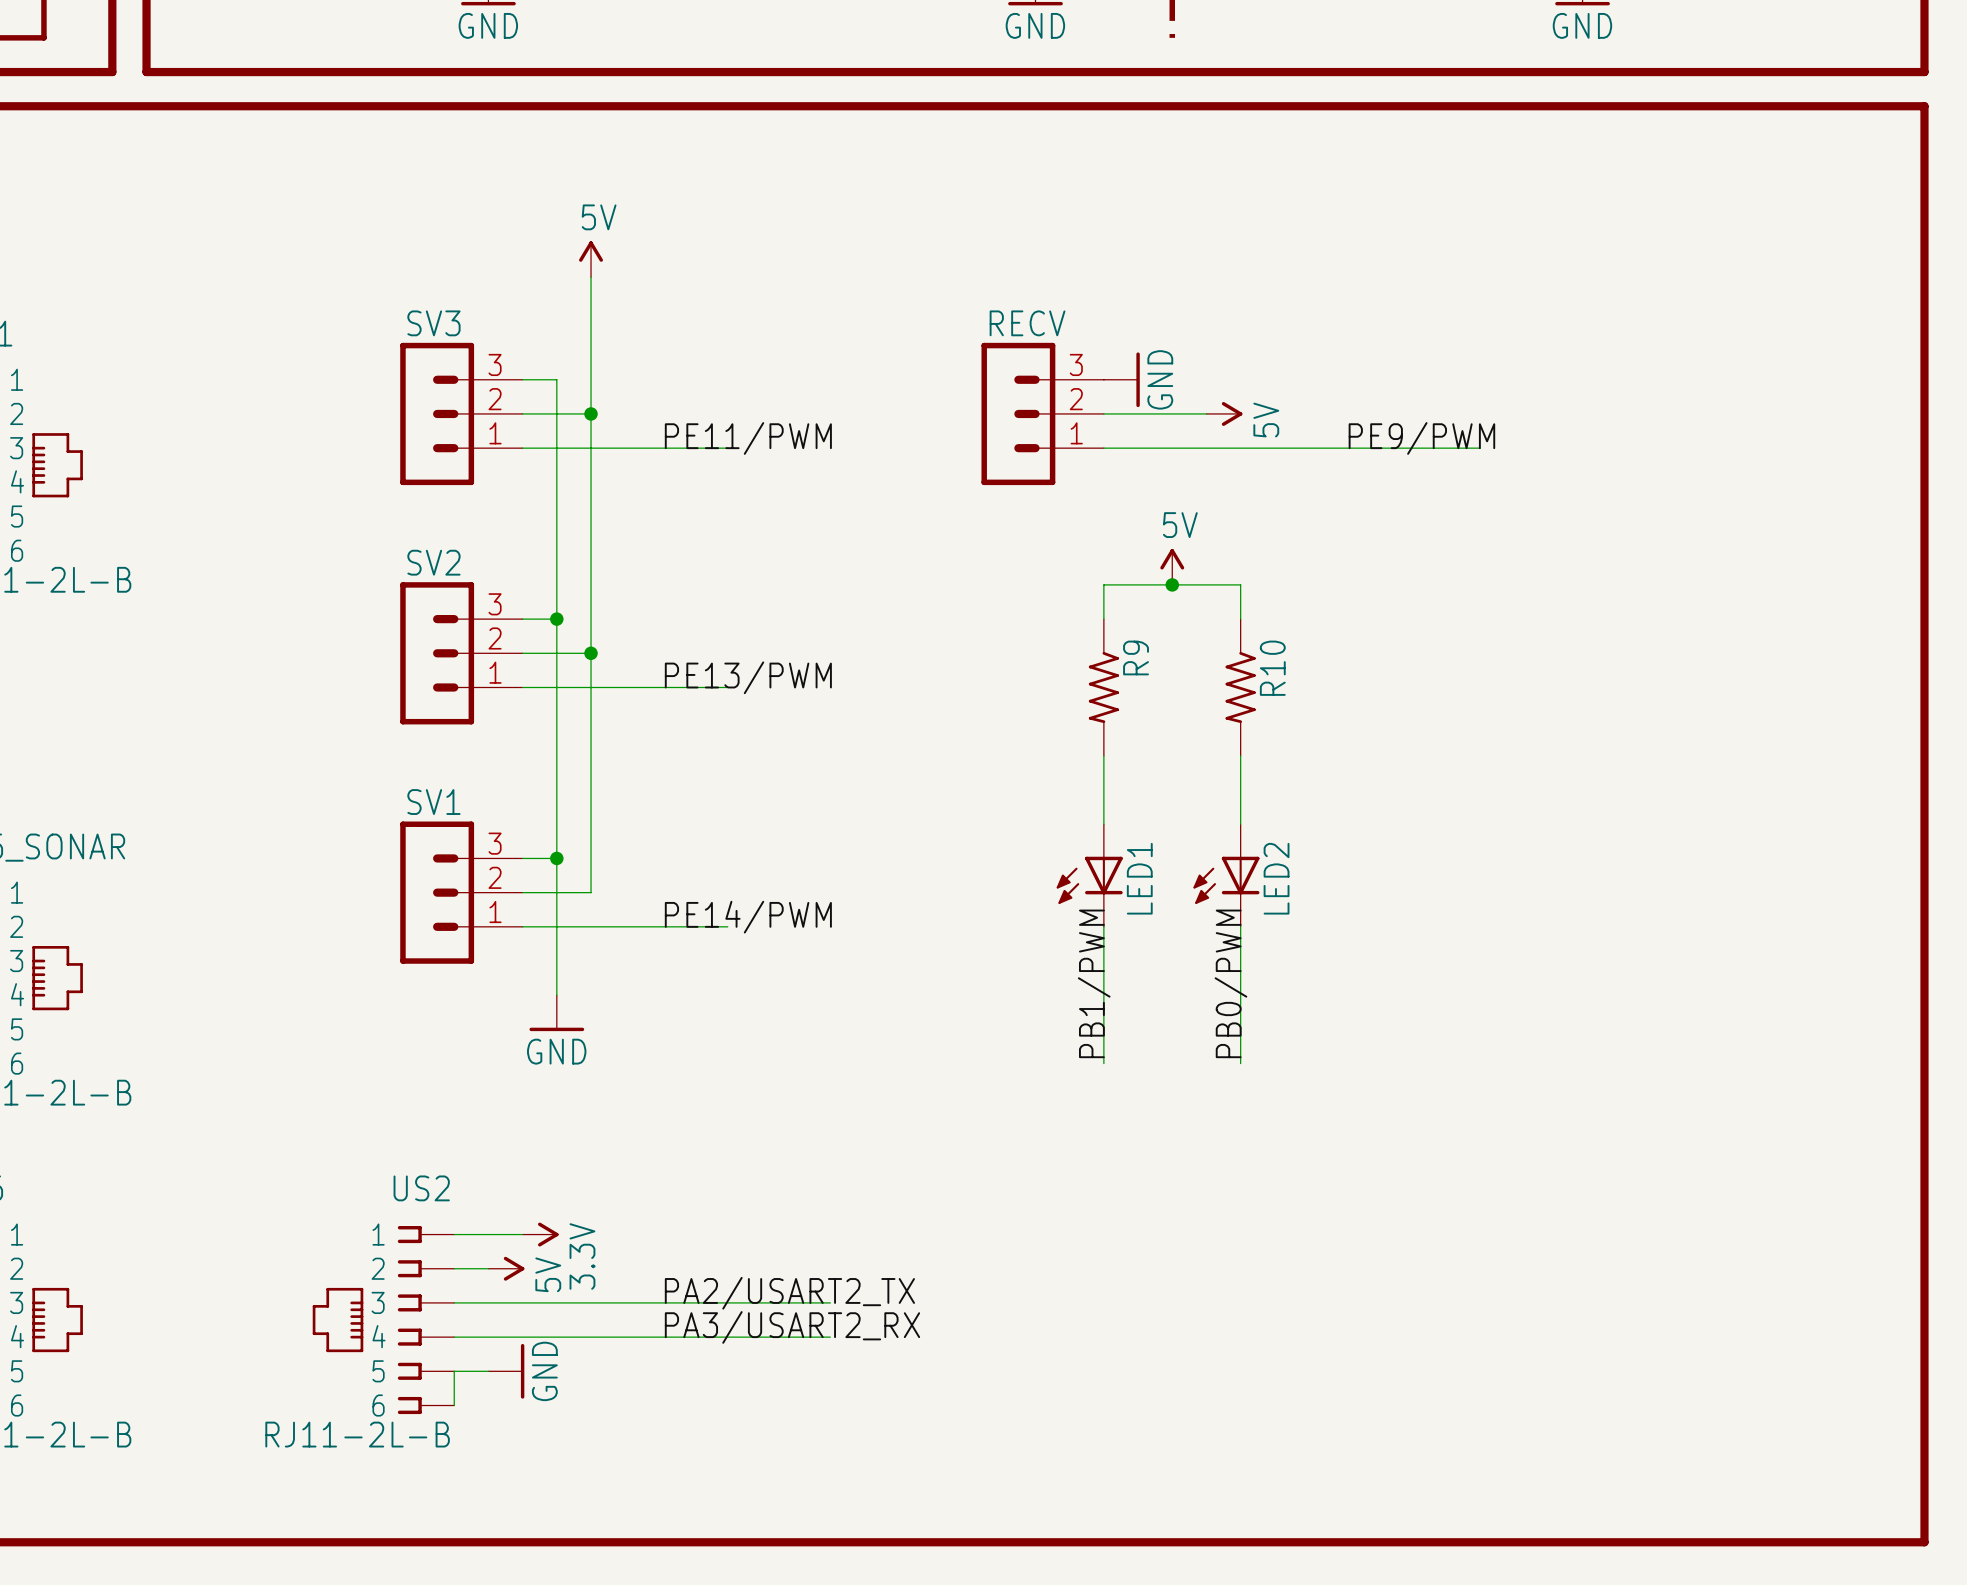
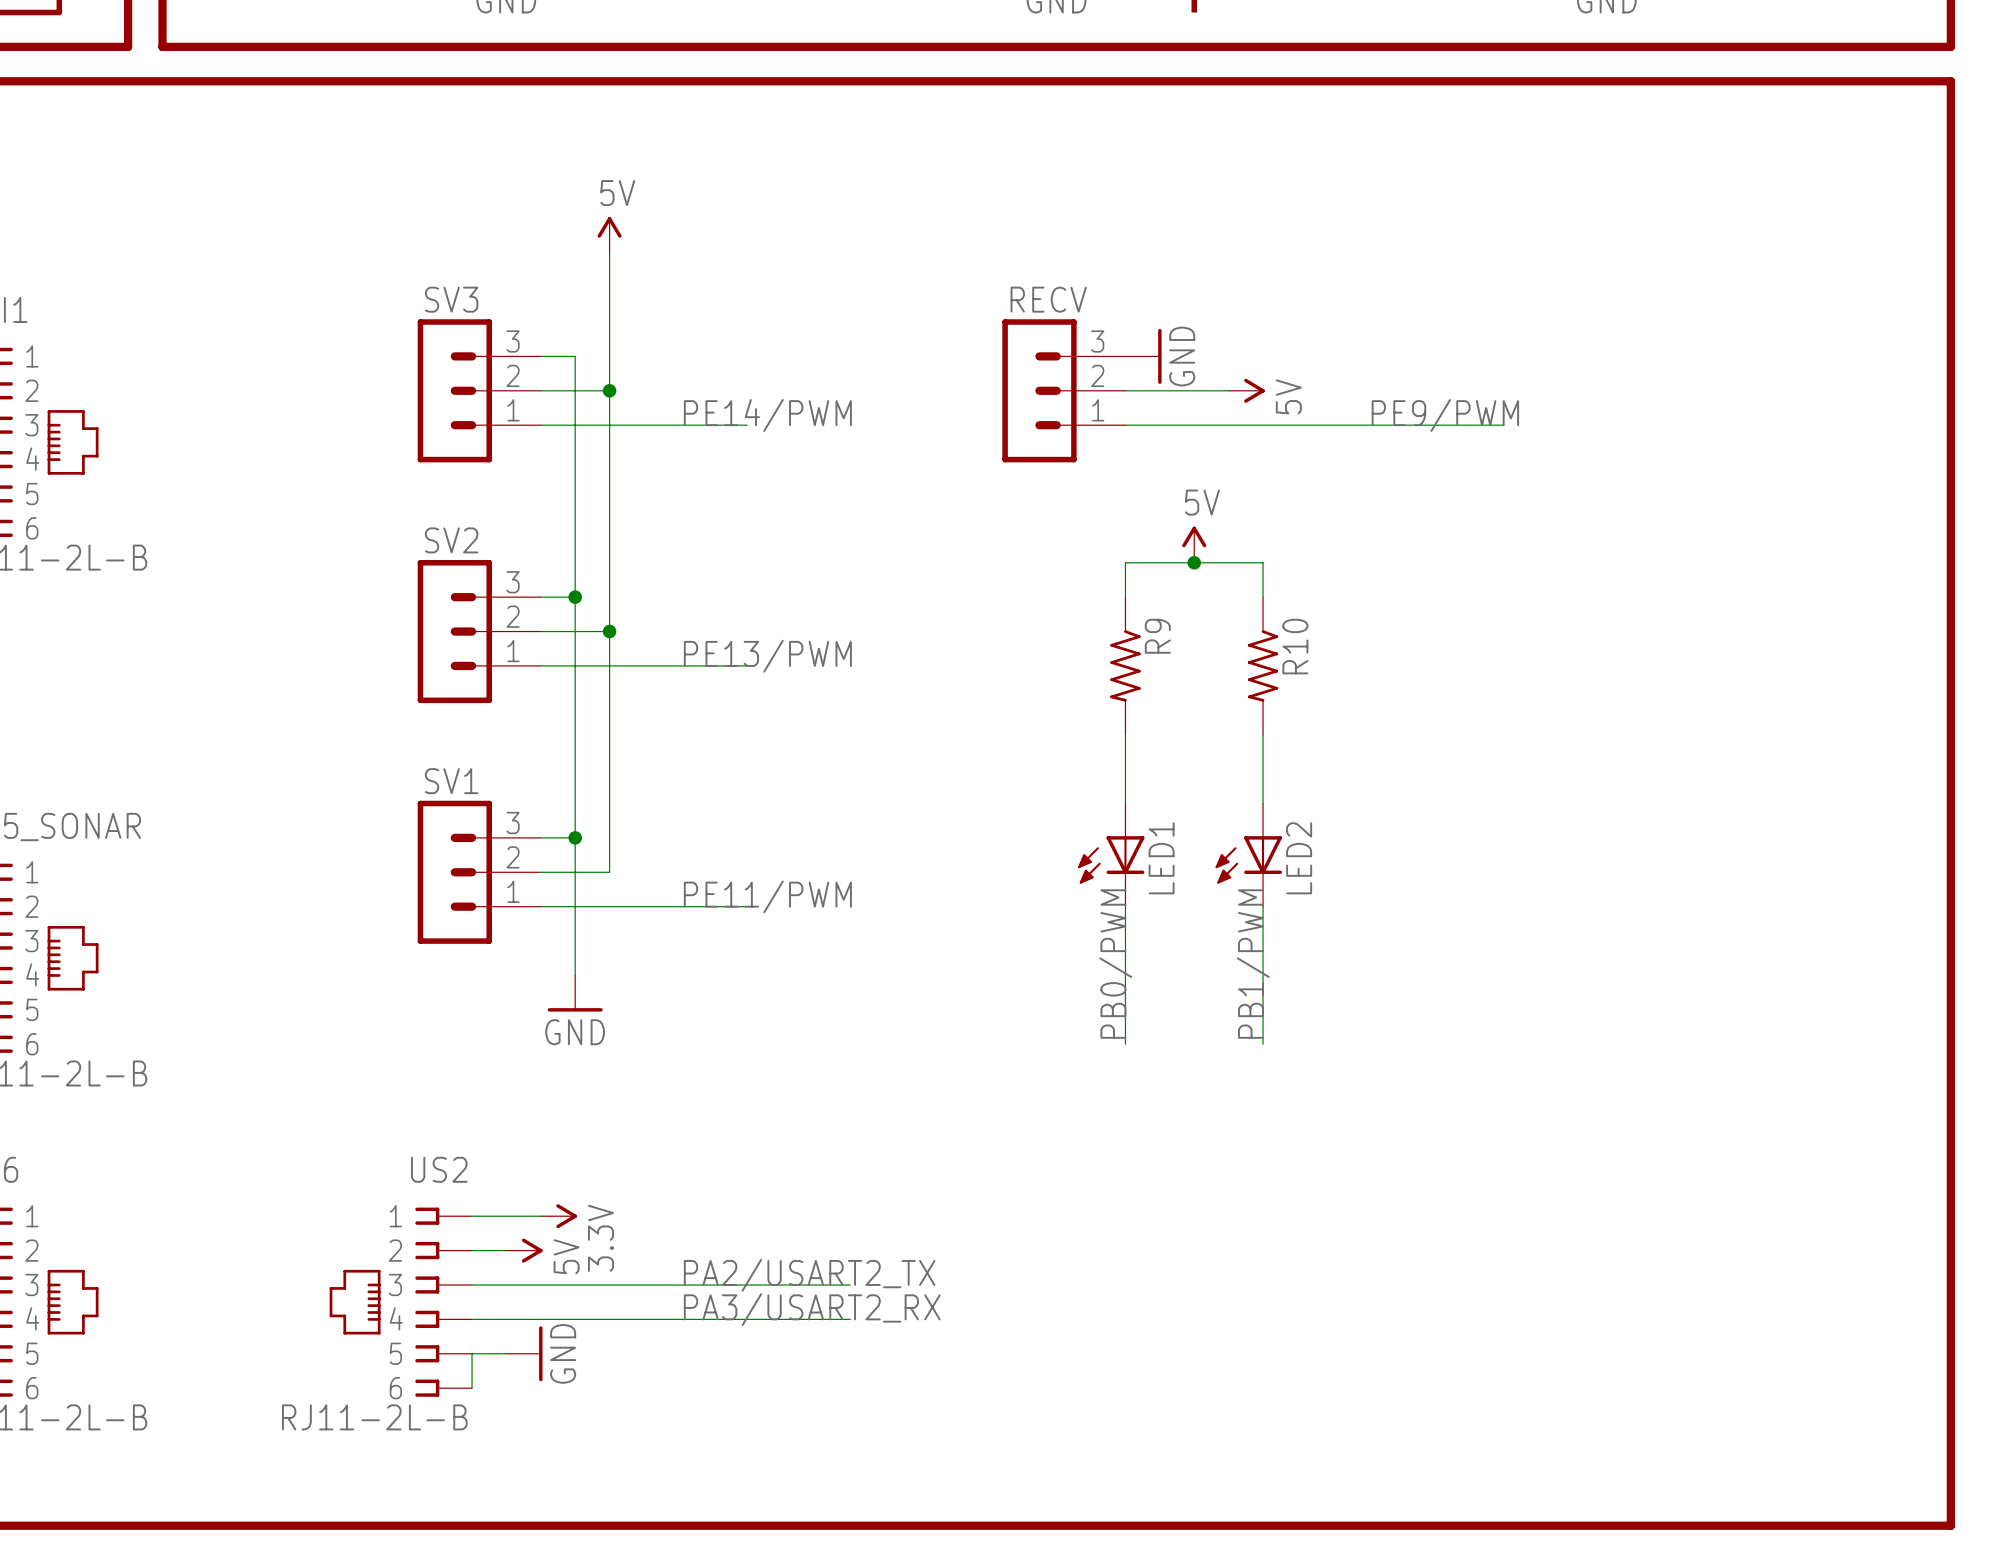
label: PE11/PWM (748, 438) -> PE14/PWM (767, 415)
label: PE14/PWM (748, 917) -> PE11/PWM (767, 896)
label: PB1/PWM (1094, 983) -> PB0/PWM (1115, 964)
label: PB0/PWM (1230, 983) -> PB1/PWM (1253, 964)

